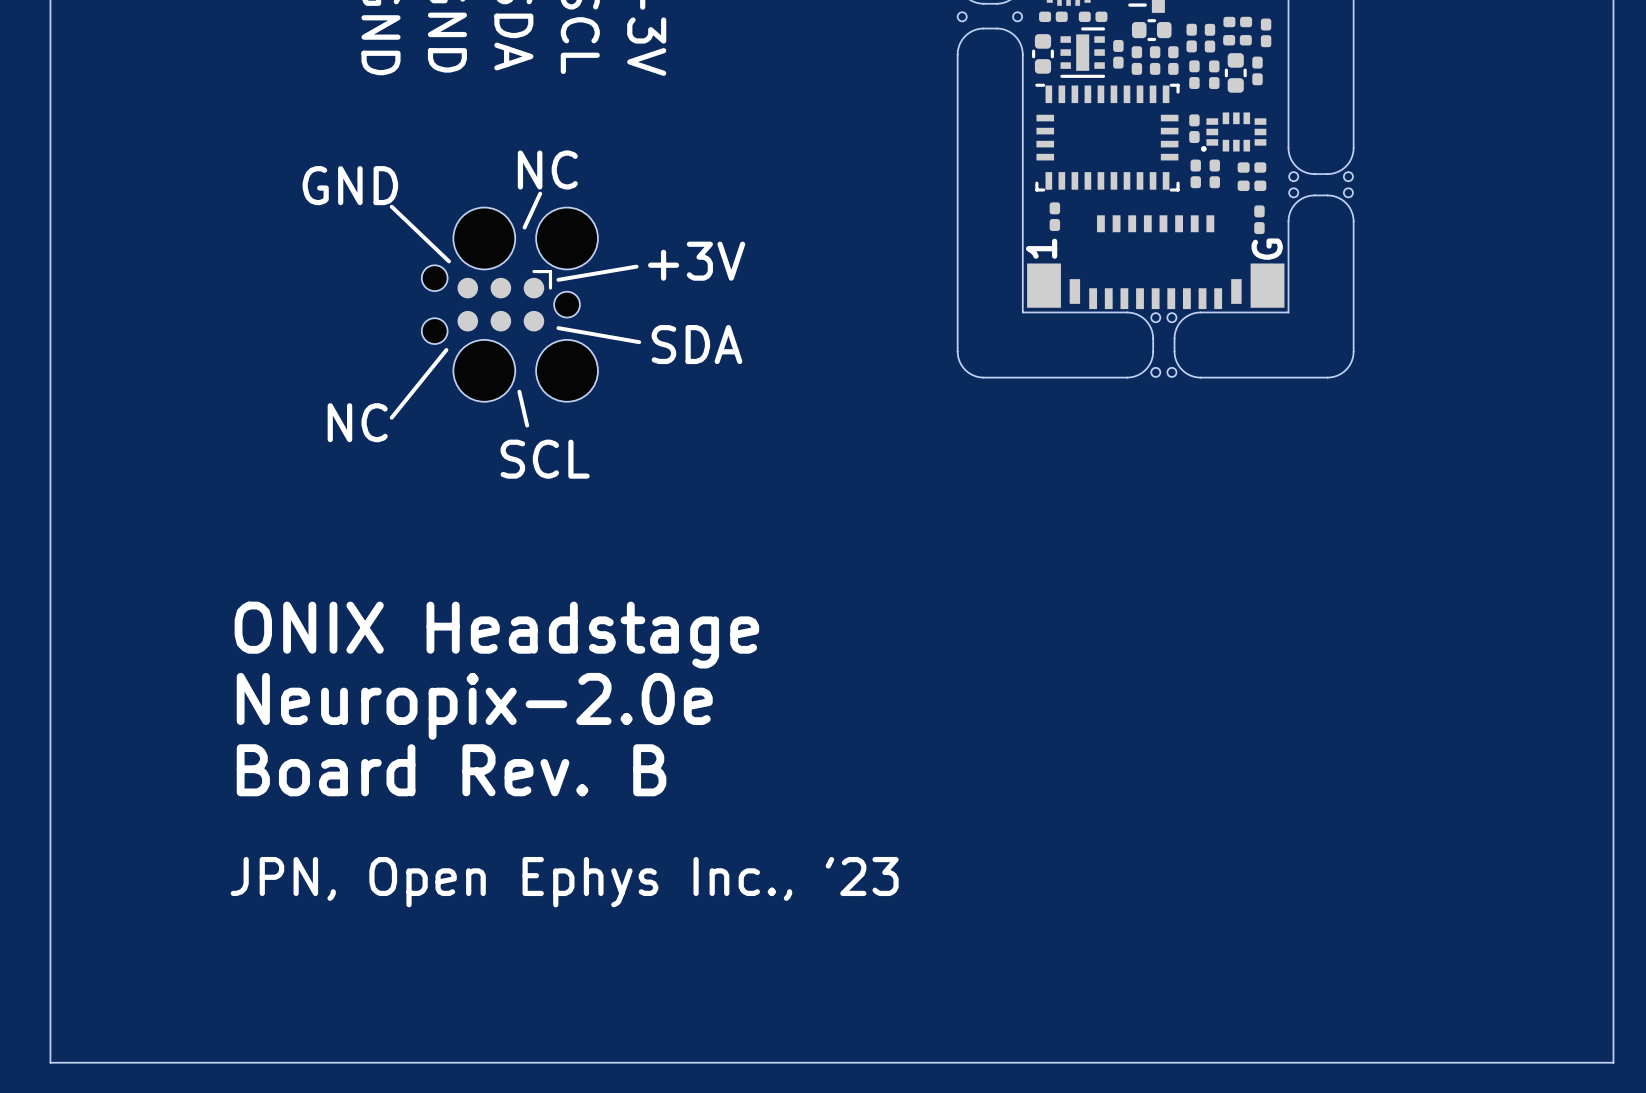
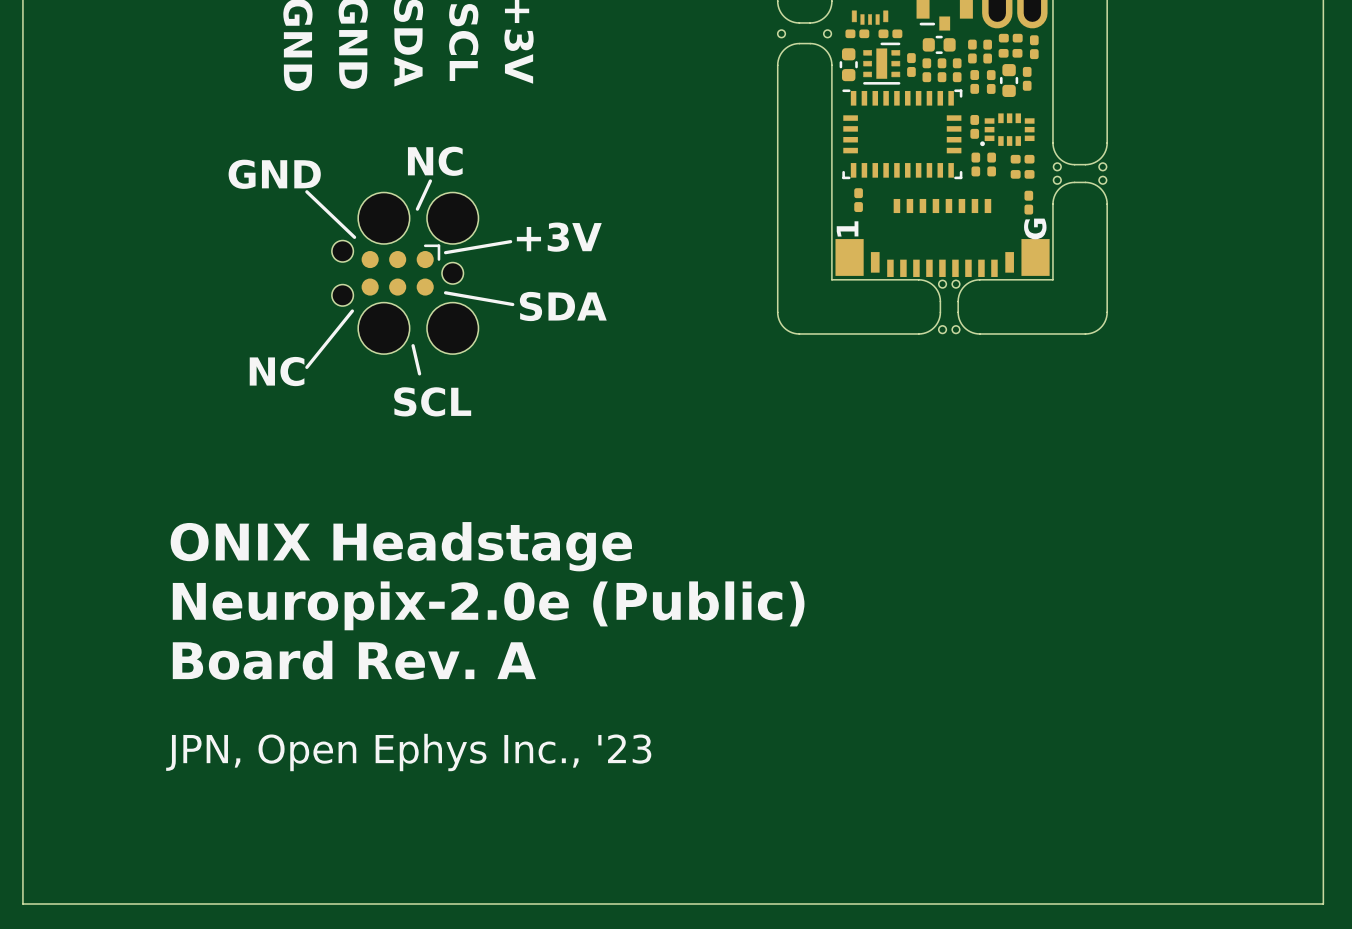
text: Neuropix-2.0e (474, 706) -> Neuropix-2.0e (Public) (488, 605)
text: Board Rev. B (451, 770) -> Board Rev. A (354, 660)

